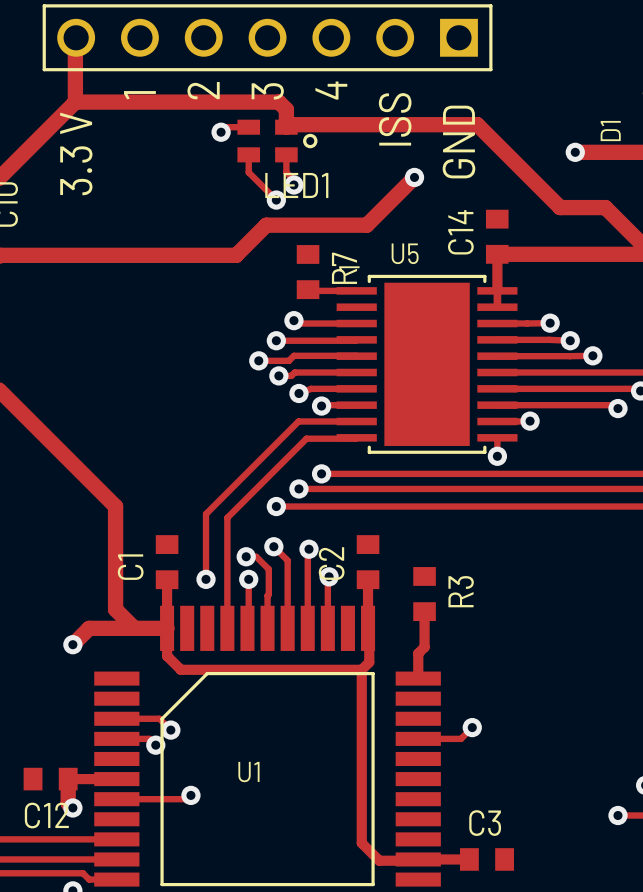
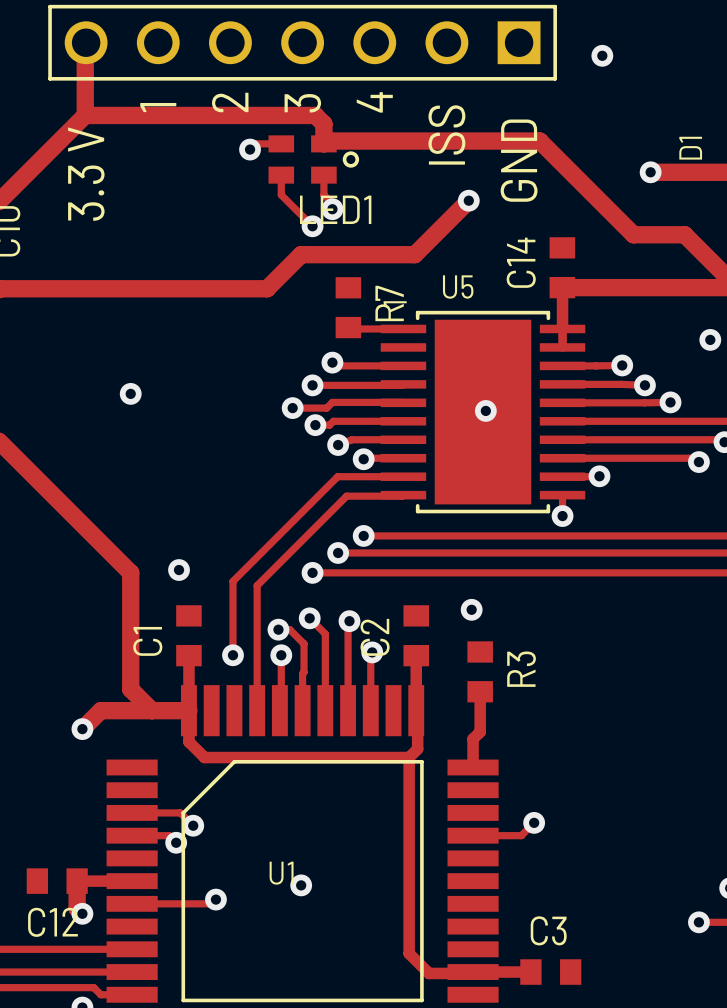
via: none -> (602, 55)
via: none -> (710, 339)
via: none -> (130, 393)
via: none -> (485, 410)
via: none -> (179, 570)
via: none -> (471, 609)
via: none -> (301, 885)

